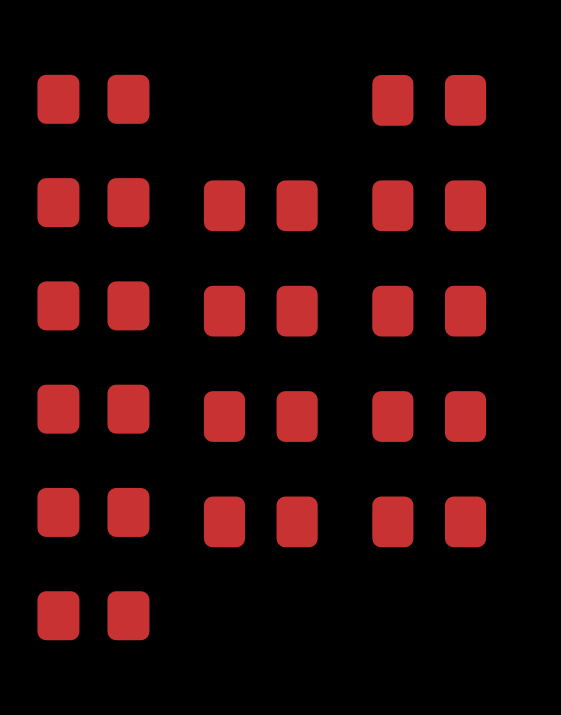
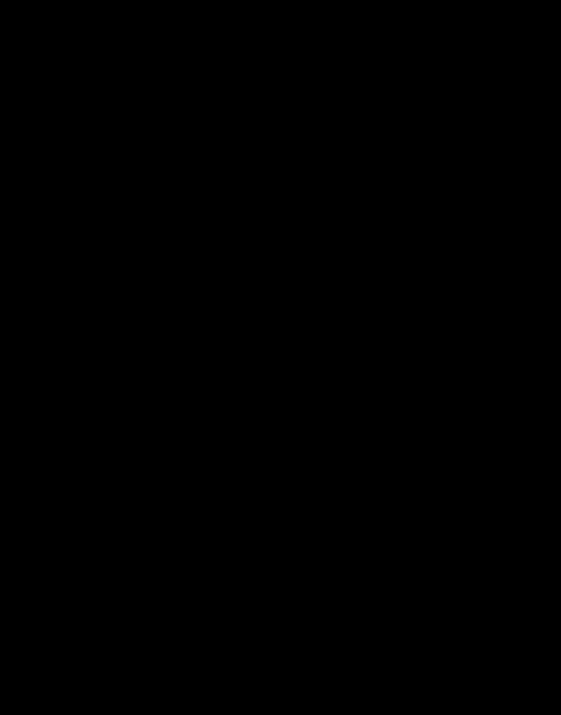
part: (93, 99) -> none
part: (429, 100) -> none
part: (93, 202) -> none
part: (260, 205) -> none
part: (429, 205) -> none
part: (93, 305) -> none
part: (260, 311) -> none
part: (429, 311) -> none
part: (93, 409) -> none
part: (260, 416) -> none
part: (429, 416) -> none
part: (93, 512) -> none
part: (260, 521) -> none
part: (429, 521) -> none
part: (93, 615) -> none

